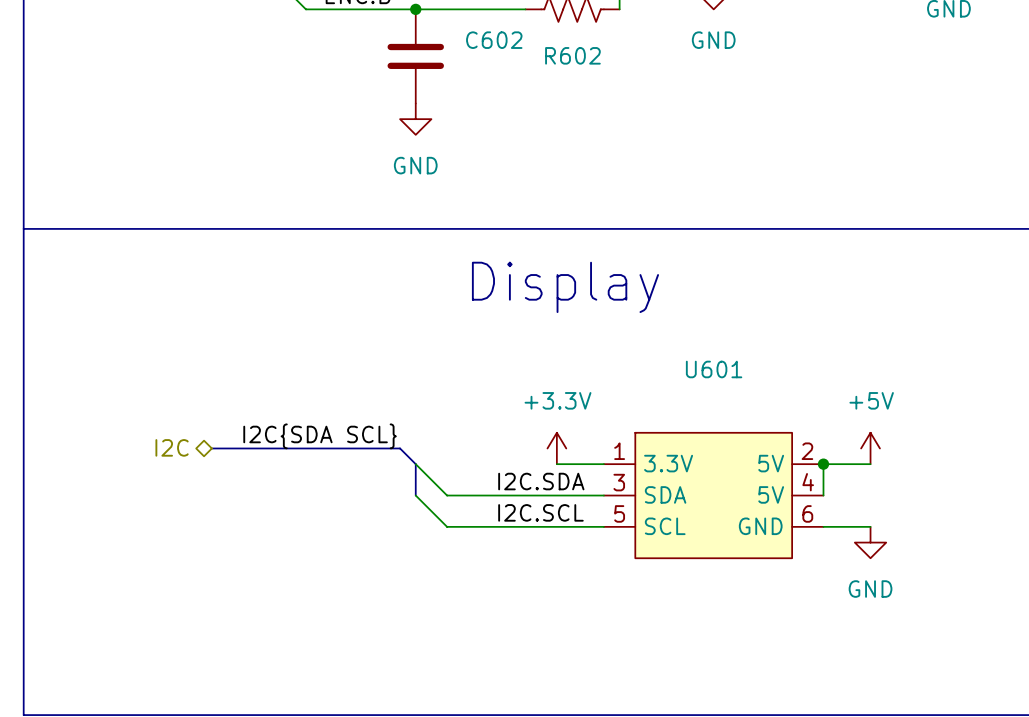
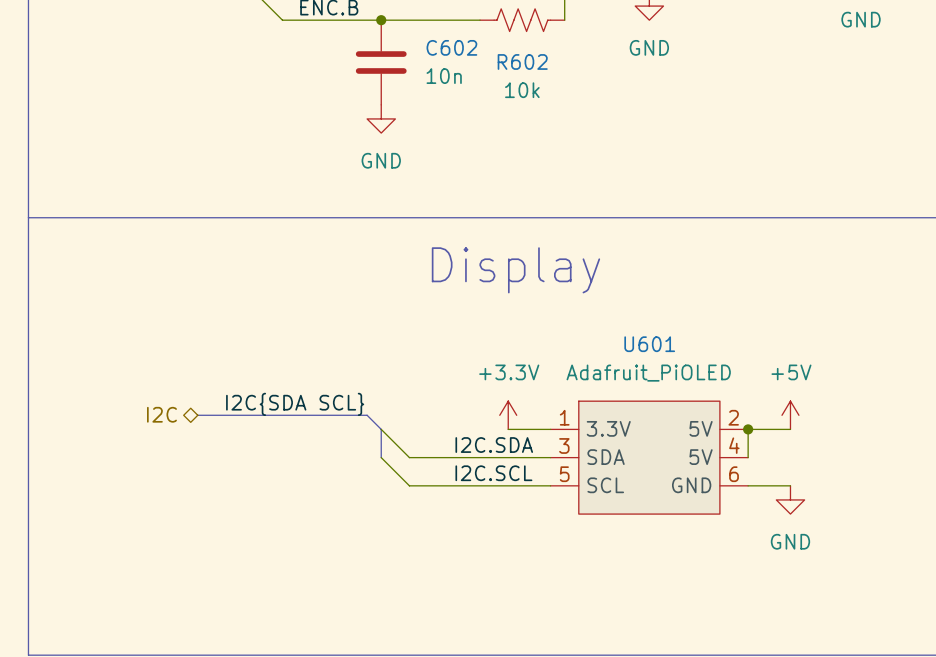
C602 value: none -> 10n (444, 76)
R602 value: none -> 10k (522, 90)
U601 value: none -> Adafruit_PiOLED (648, 373)

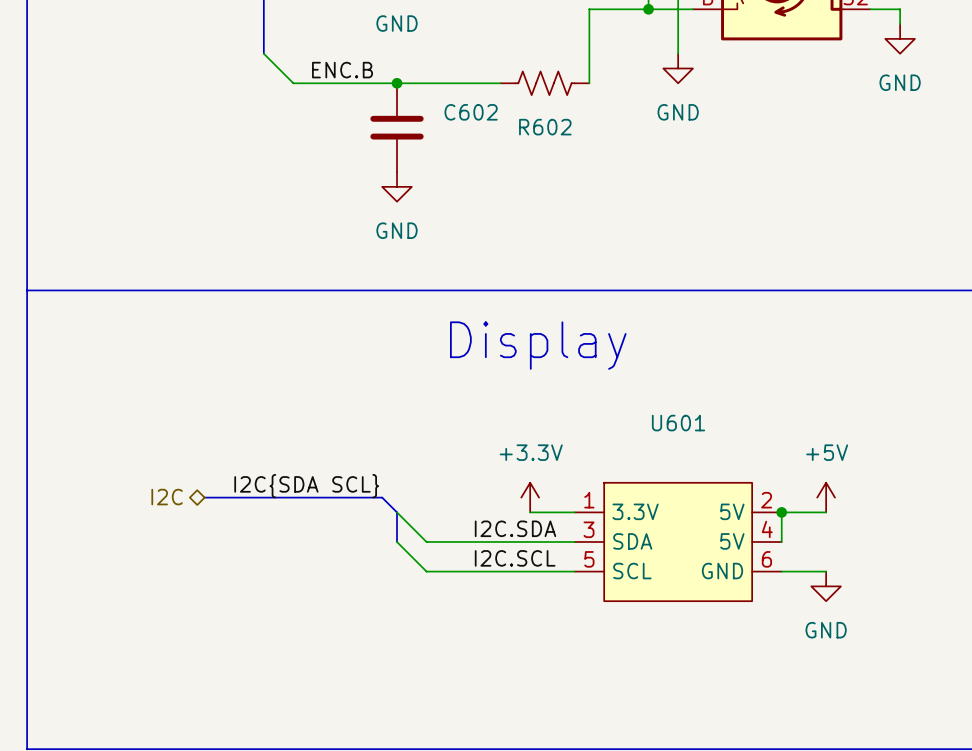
C602 value: 10n (444, 76) -> none
R602 value: 10k (522, 90) -> none
U601 value: Adafruit_PiOLED (648, 373) -> none

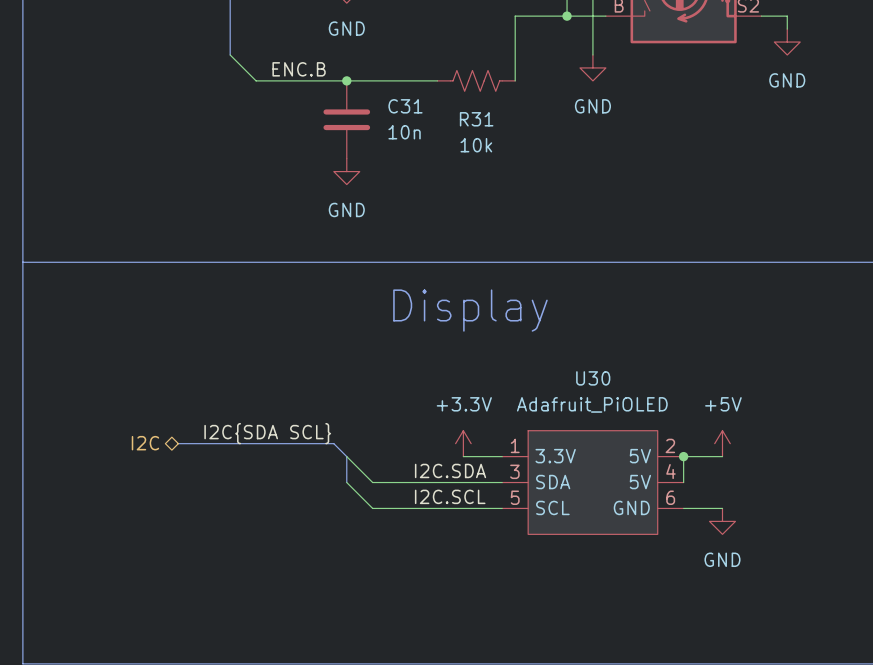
C602 name: C602 (471, 112) -> C31 (405, 106)
R602 name: R602 (545, 127) -> R31 (476, 119)
C602 value: none -> 10n (404, 132)
R602 value: none -> 10k (476, 145)
U601 name: U601 (678, 423) -> U30 (593, 378)
U601 value: none -> Adafruit_PiOLED (592, 404)

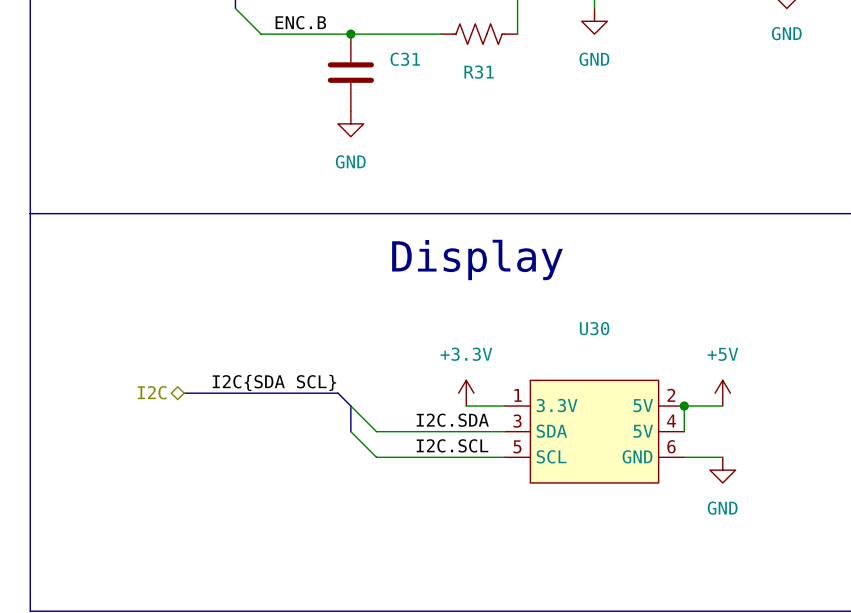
C31 value: 10n (404, 132) -> none
R31 value: 10k (476, 145) -> none
U30 value: Adafruit_PiOLED (592, 404) -> none

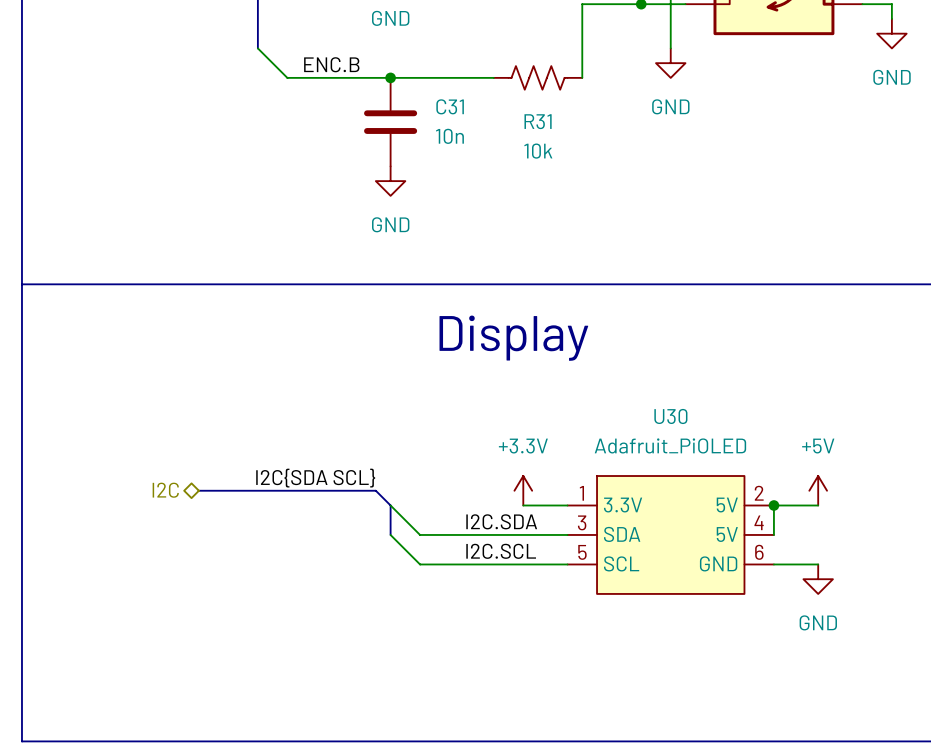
C31 value: none -> 10n (449, 136)
R31 value: none -> 10k (538, 151)
U30 value: none -> Adafruit_PiOLED (670, 445)

